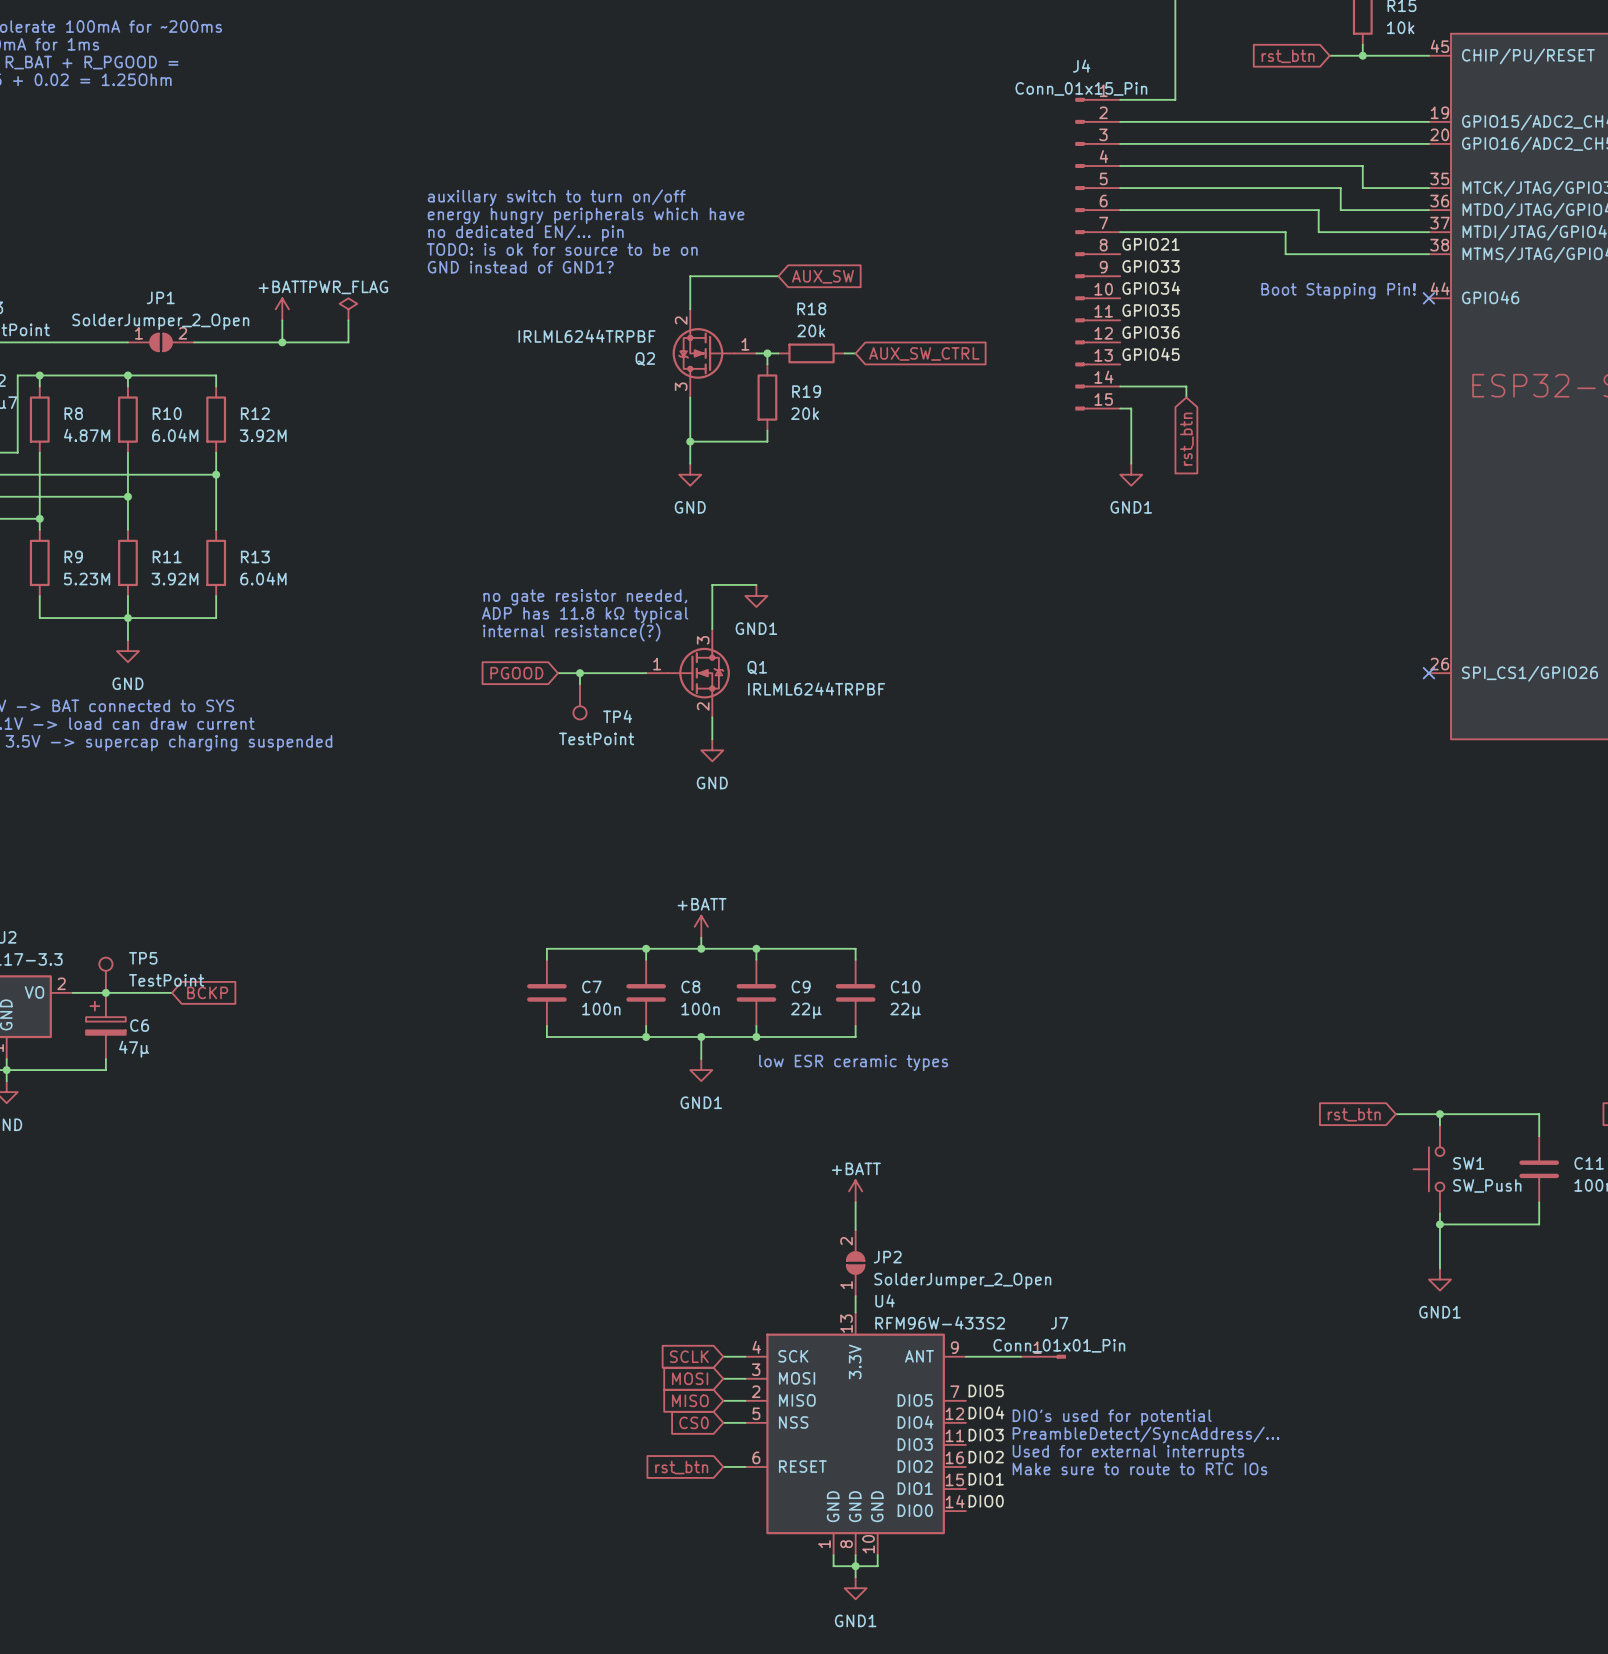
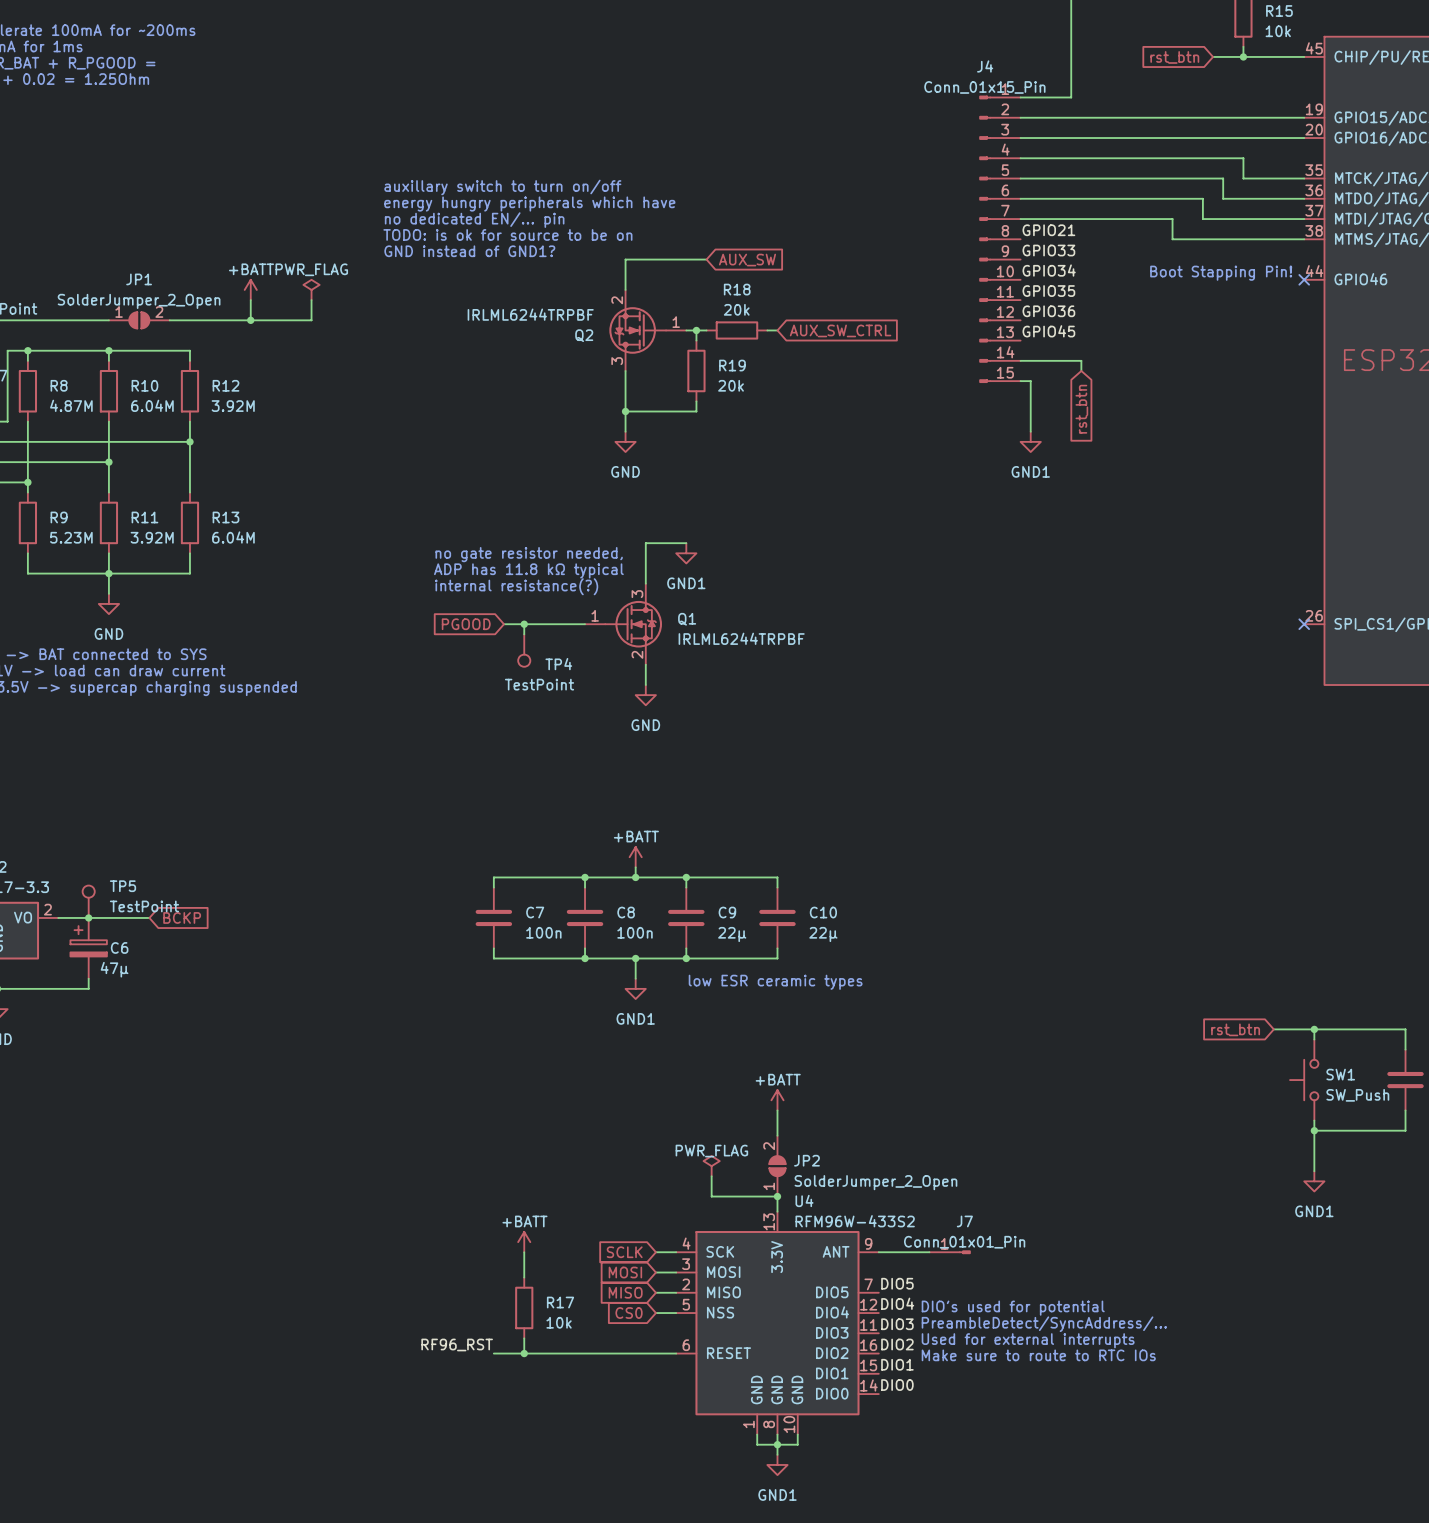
power symbol: none -> PWR_FLAG (711, 1166)
wire: none -> (711, 1176) (711, 1196) (777, 1196)
junction: none -> (777, 1196)
power symbol: none -> +BATT (524, 1242)
wire: none -> (524, 1252) (524, 1277)
R17: none -> 10k (524, 1307)
wire: none -> (524, 1338) (524, 1353)
label: none -> RF96_RST (457, 1344)
wire: none -> (493, 1353) (655, 1353)
junction: none -> (524, 1353)
global label: rst_btn (681, 1467) -> none

